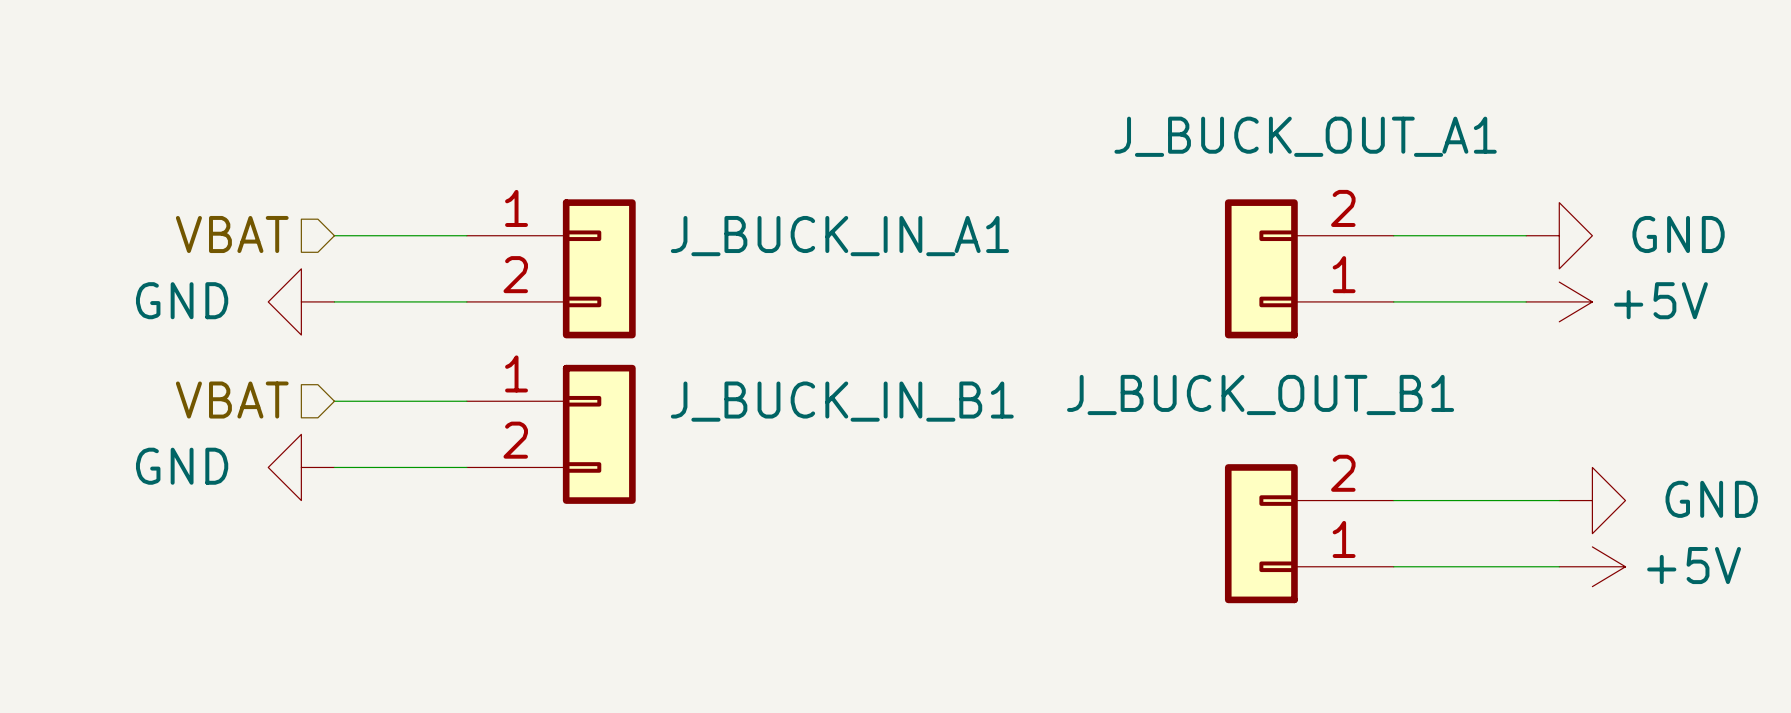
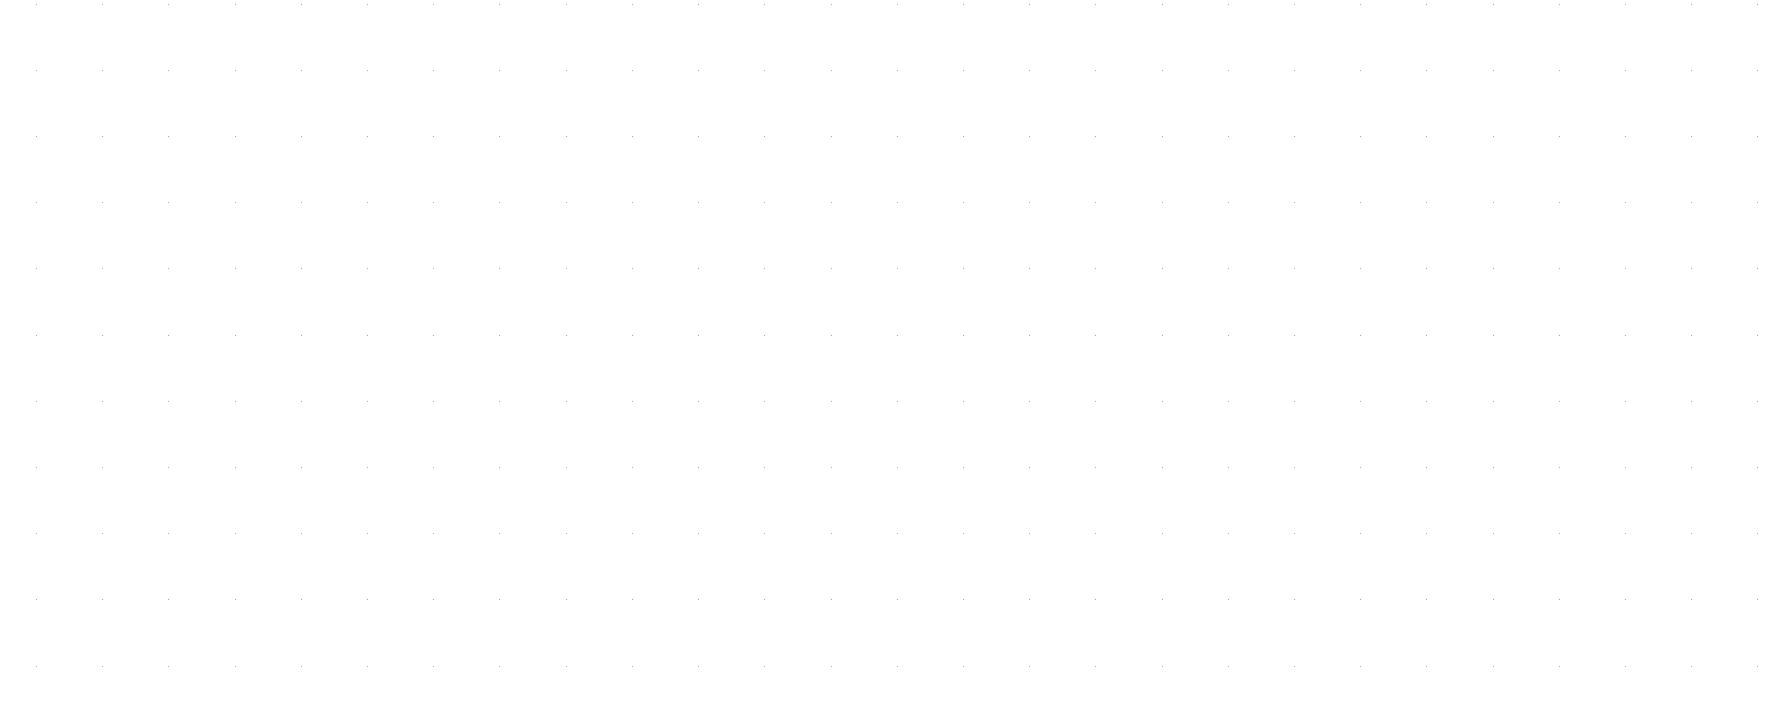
hierarchical label: VBAT (232, 234) -> none
wire: (334, 235) (466, 235) -> none
wire: (1393, 235) (1526, 235) -> none
power symbol: GND (1559, 235) -> none
J_BUCK_IN_A1: (551, 268) -> none
J_BUCK_OUT_A1: (1309, 268) -> none
power symbol: GND (301, 301) -> none
wire: (334, 301) (466, 301) -> none
wire: (1393, 301) (1526, 301) -> none
power symbol: +5V (1559, 301) -> none
hierarchical label: VBAT (232, 400) -> none
wire: (334, 401) (466, 401) -> none
J_BUCK_IN_B1: (551, 434) -> none
power symbol: GND (301, 467) -> none
wire: (334, 467) (466, 467) -> none
wire: (1393, 500) (1559, 500) -> none
power symbol: GND (1592, 500) -> none
J_BUCK_OUT_B1: (1309, 533) -> none
wire: (1393, 566) (1559, 566) -> none
power symbol: +5V (1592, 566) -> none

